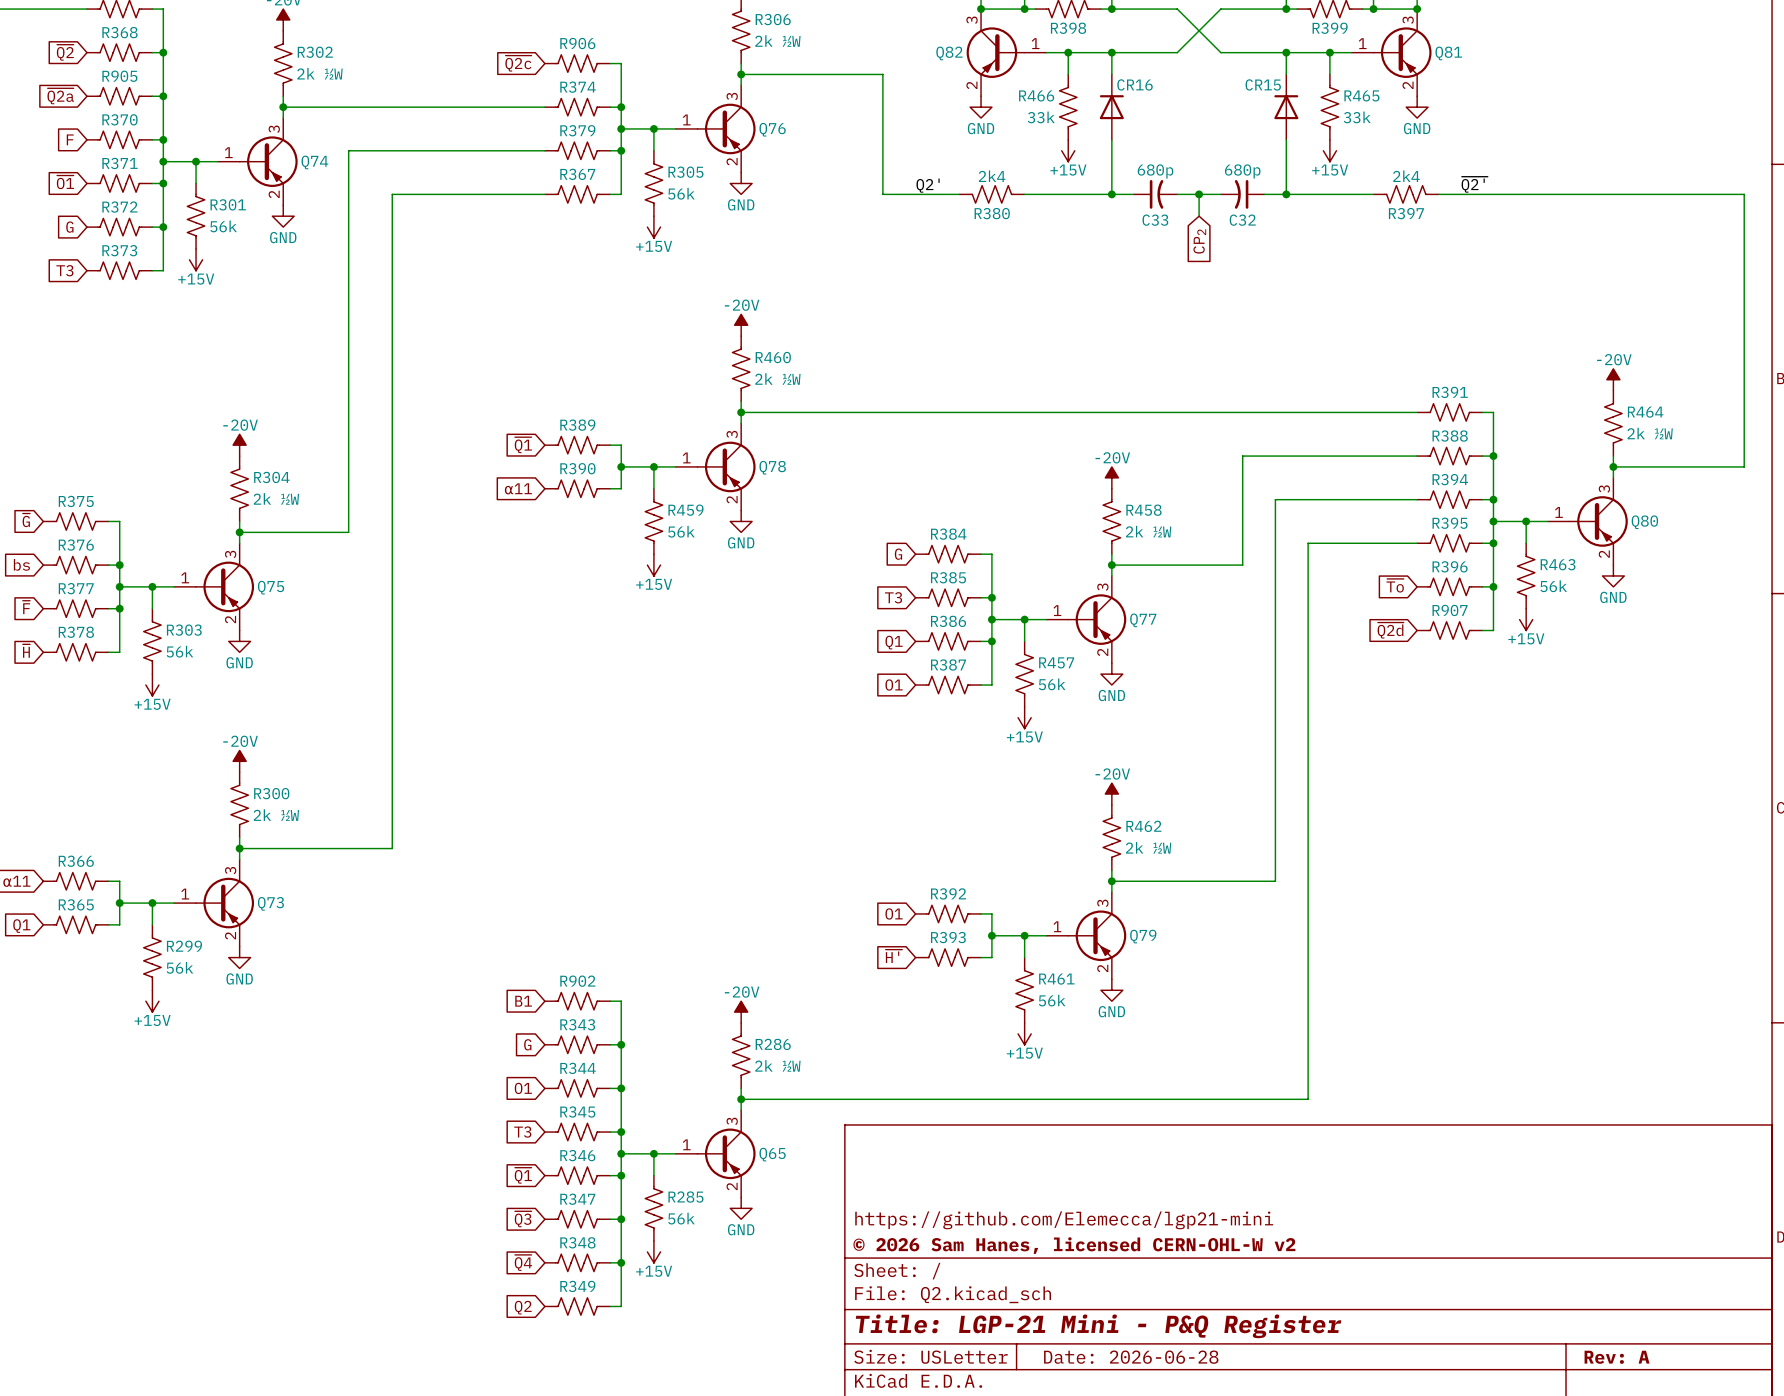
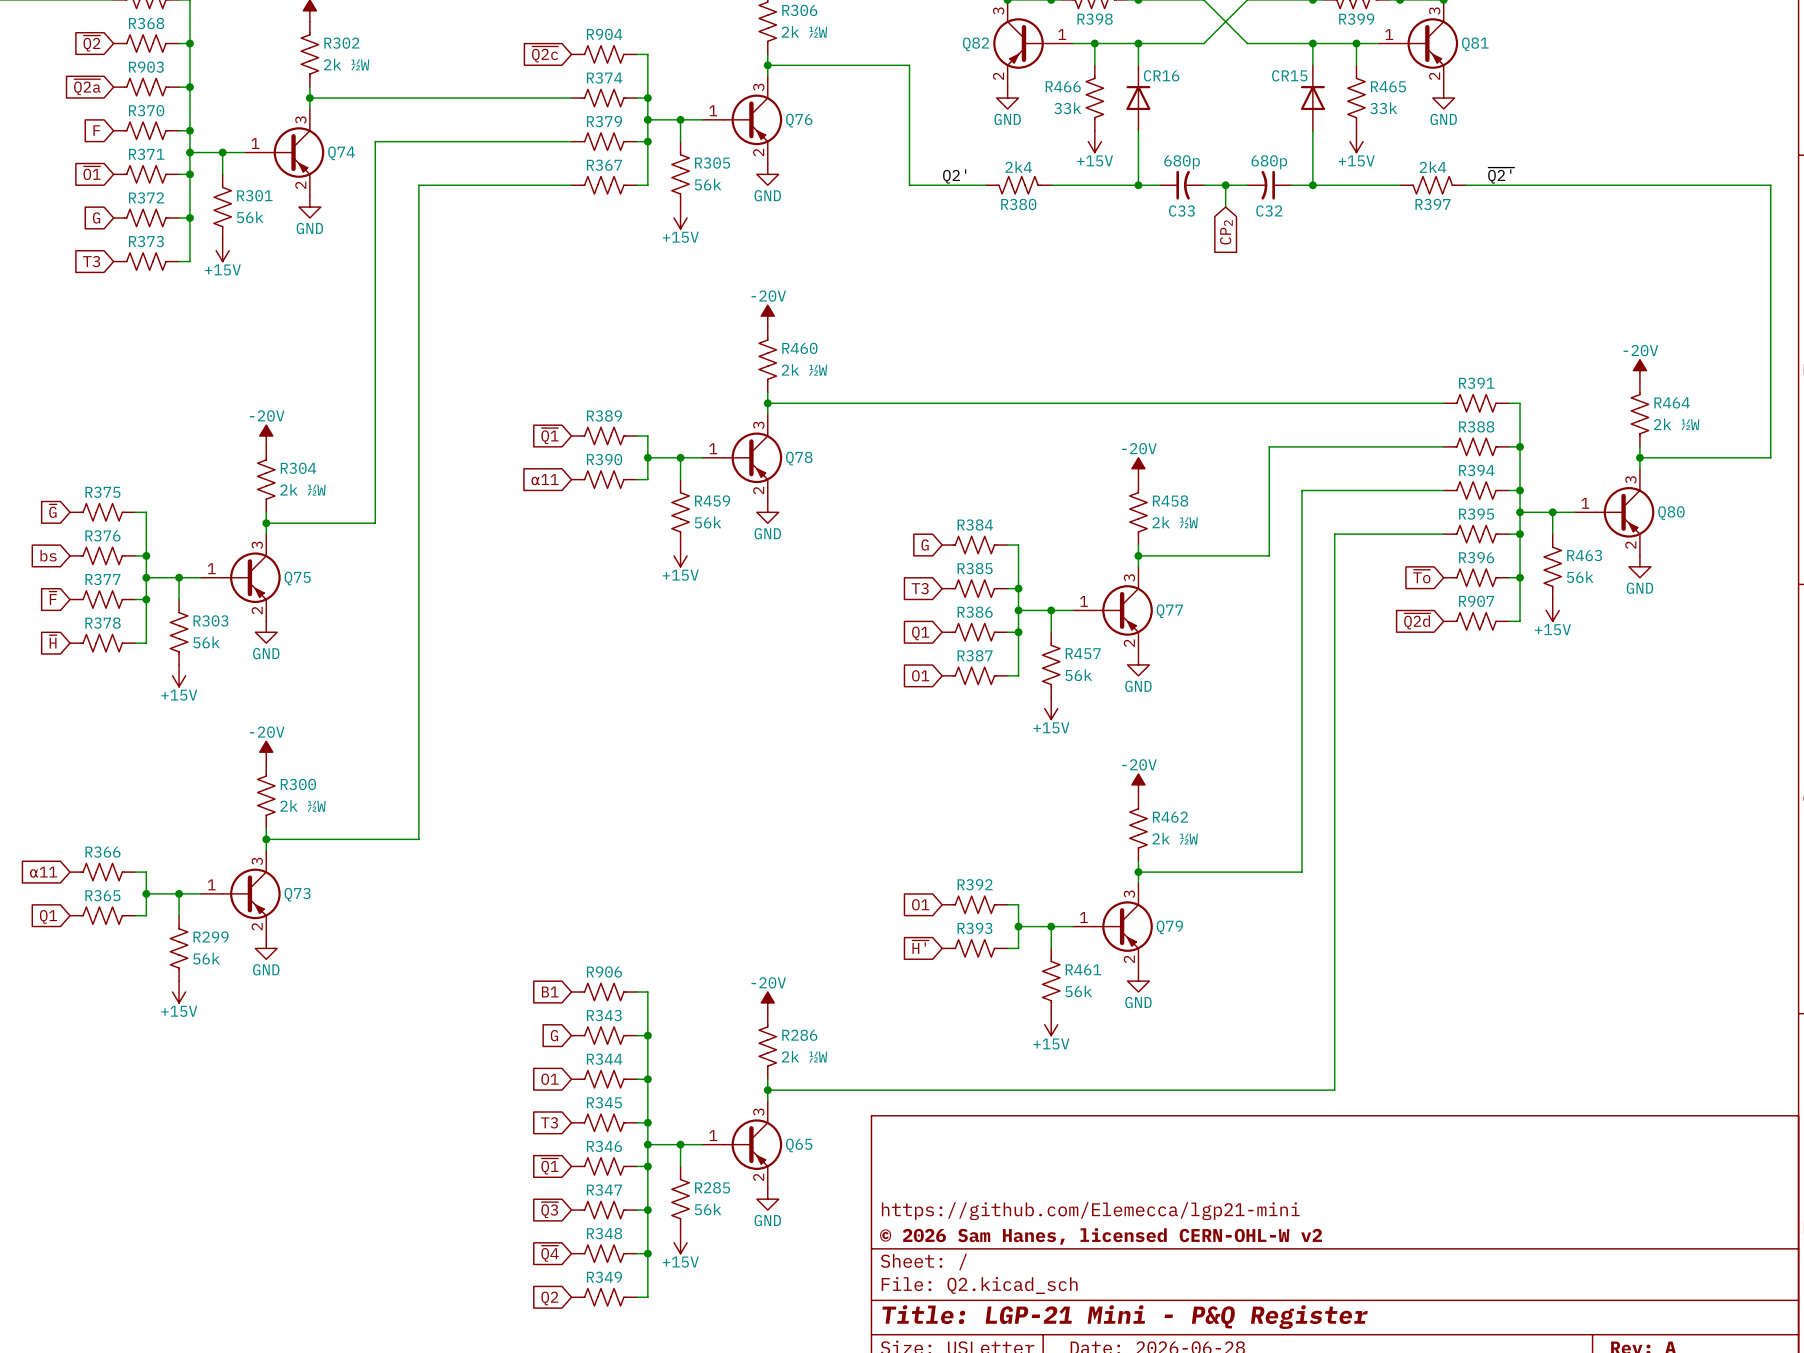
R906 name: R906 (577, 43) -> R904 (604, 34)
R905 name: R905 (119, 76) -> R903 (146, 67)
R902 name: R902 (577, 981) -> R906 (604, 971)

